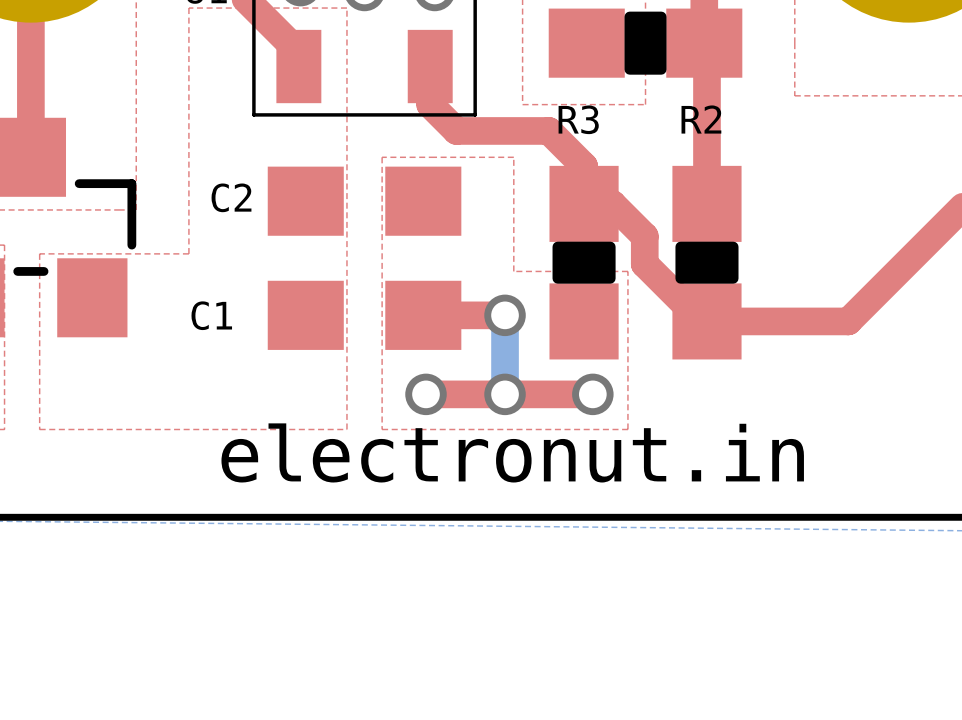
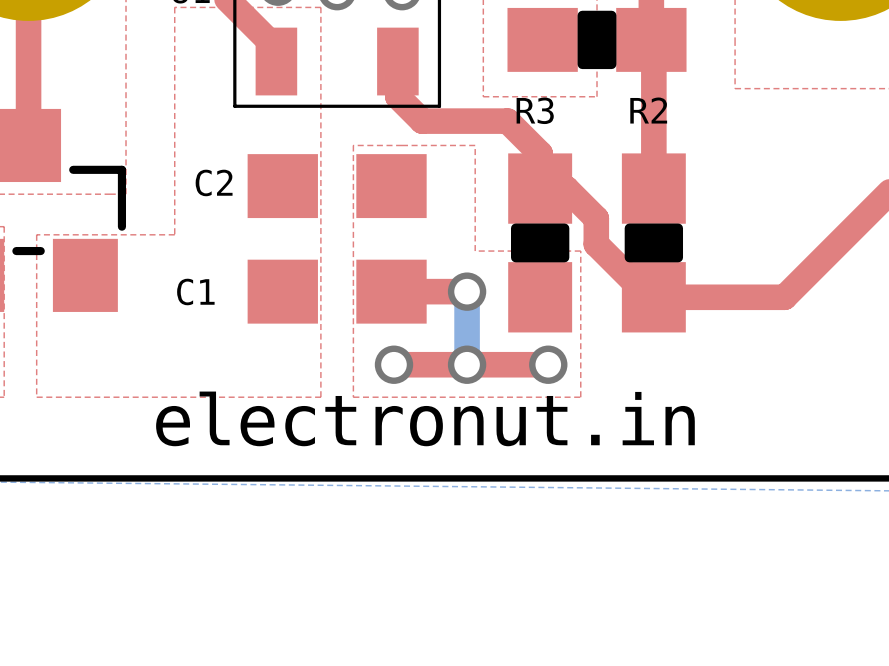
text position: electronut.in (512, 452) -> electronut.in (425, 418)

